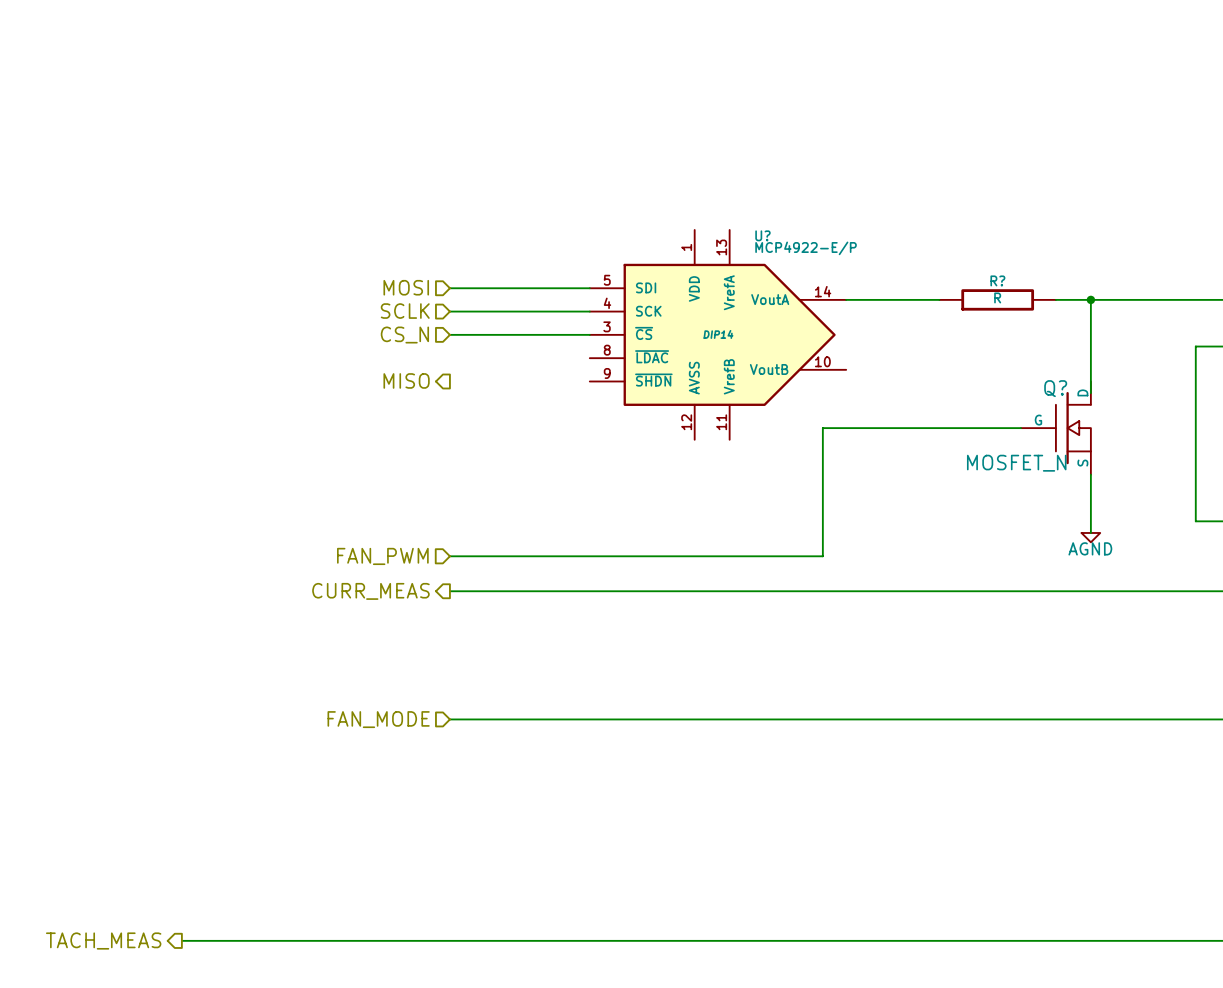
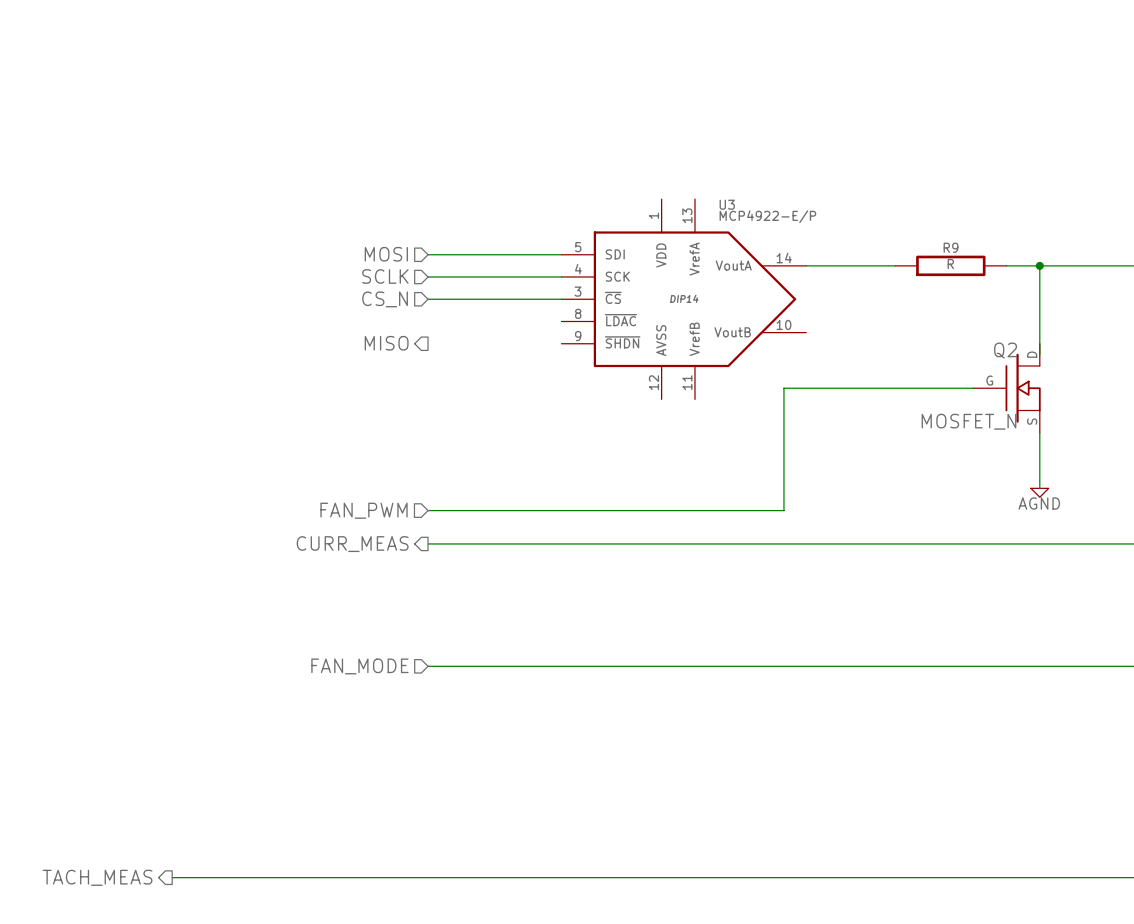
U? name: U? (762, 235) -> U3 (727, 204)
R? name: R? (997, 280) -> R9 (951, 247)
Q? name: Q? (1055, 388) -> Q2 (1005, 350)

